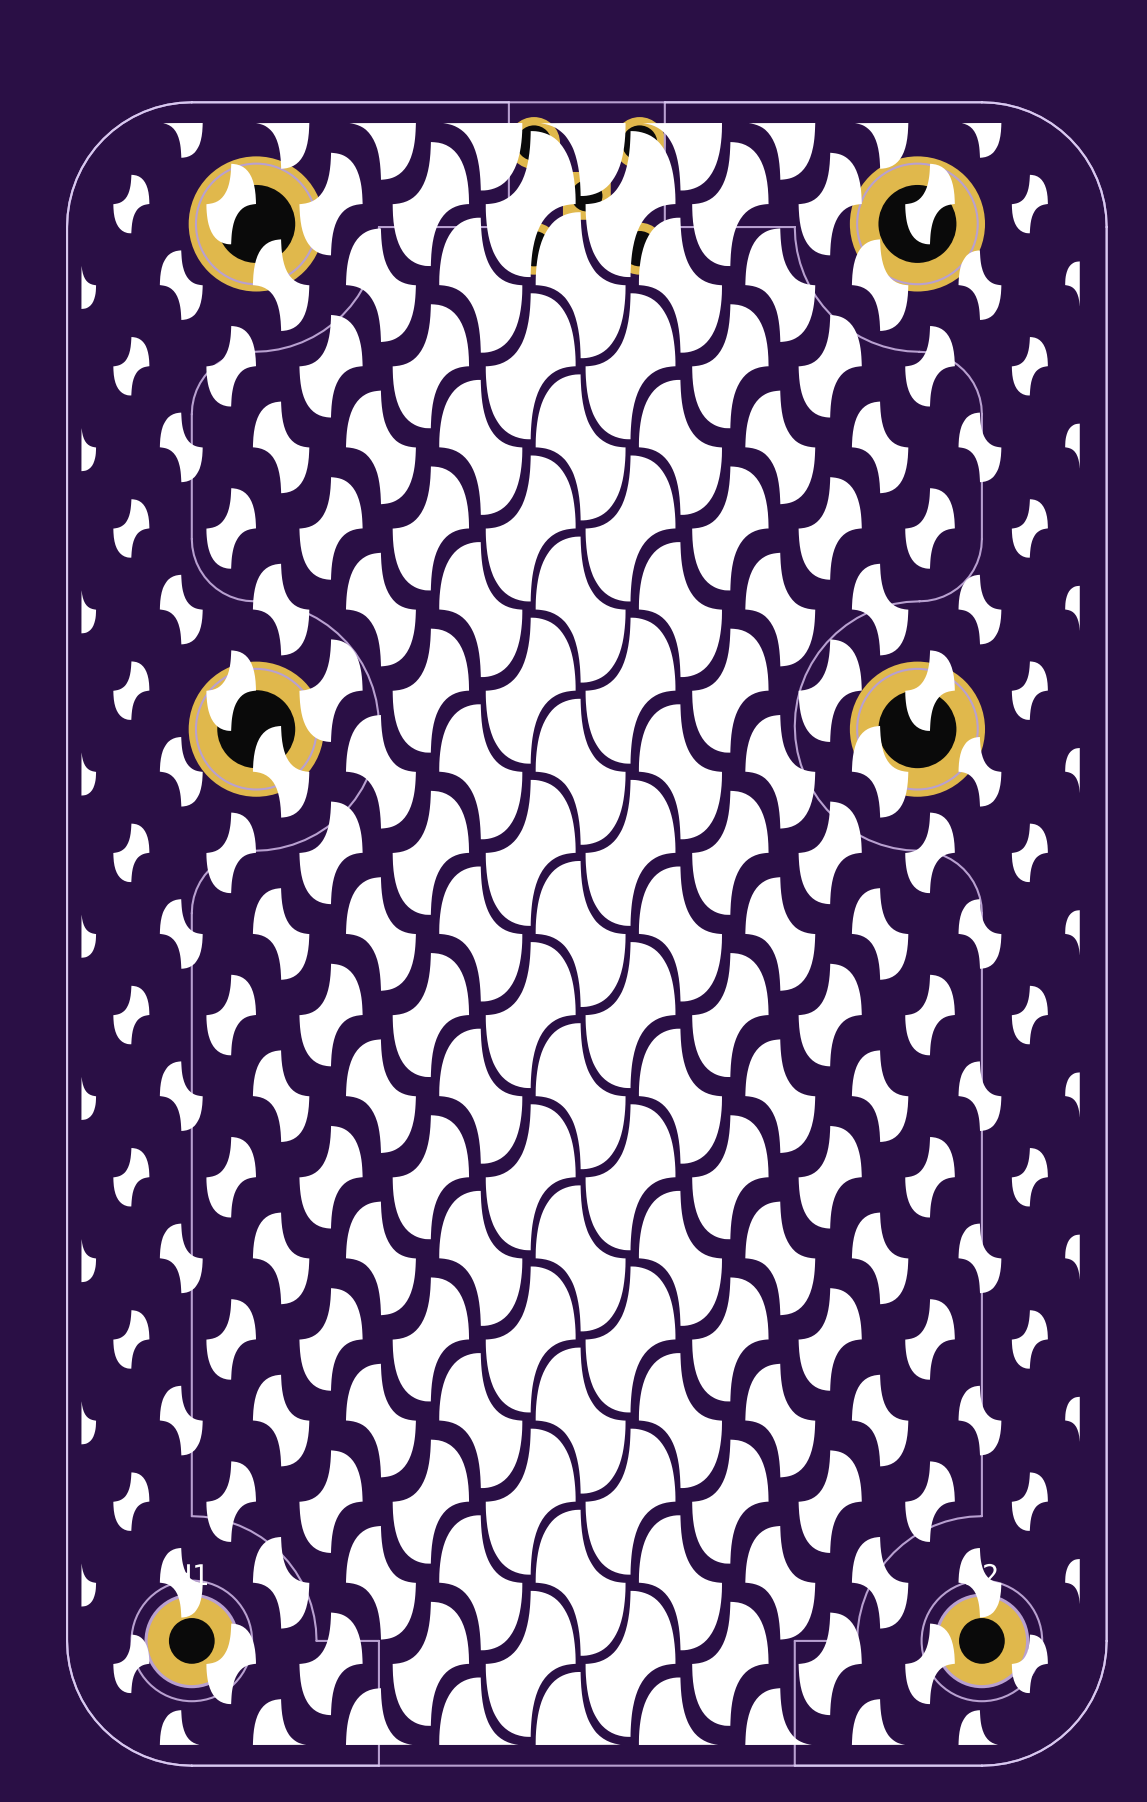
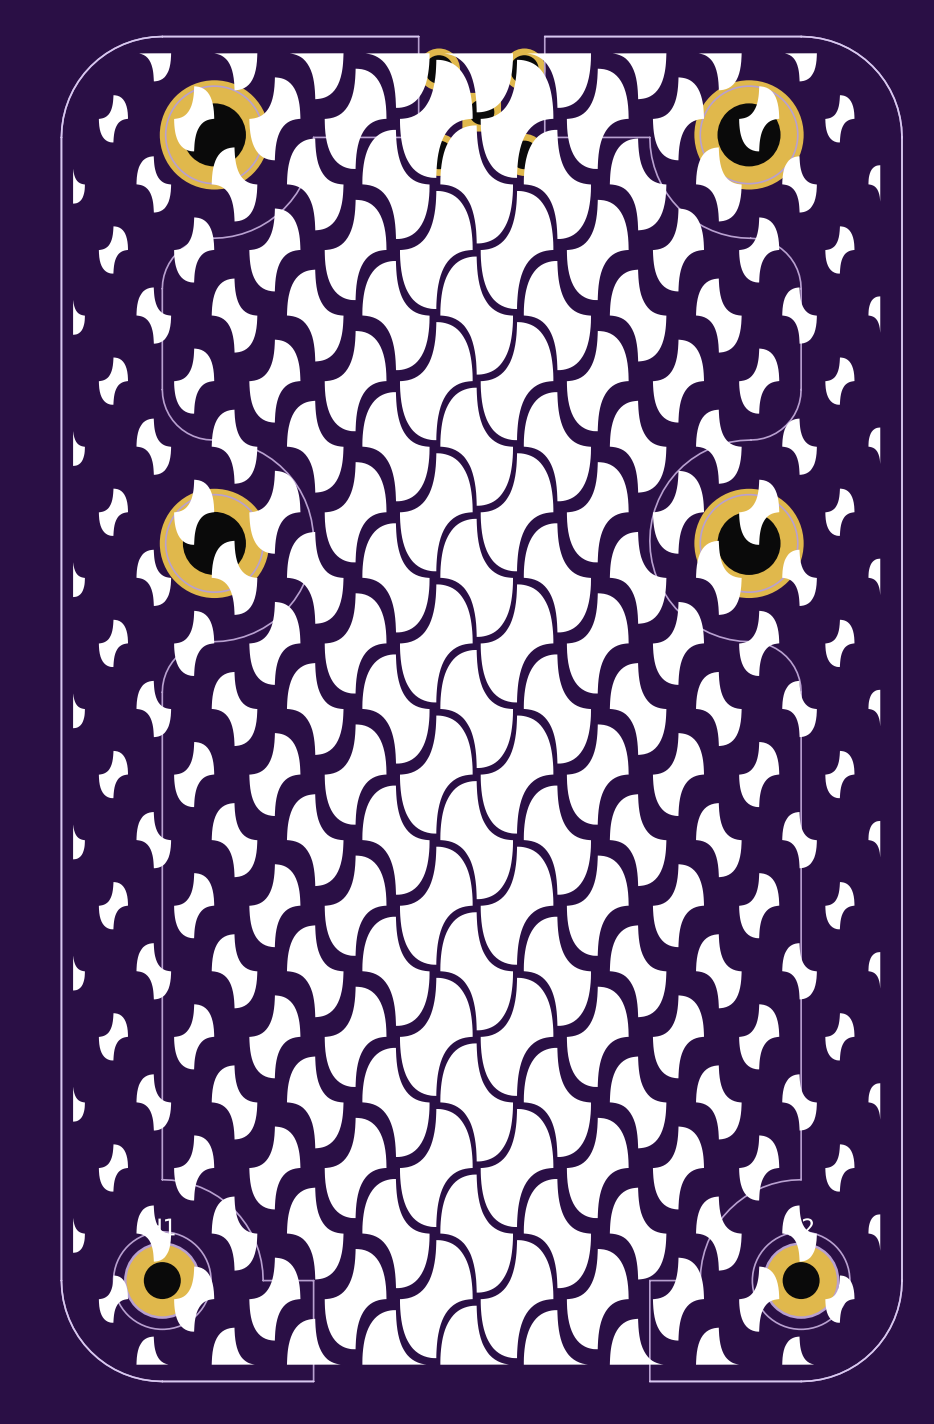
line: (508, 102) (664, 102) -> none
line: (378, 1765) (794, 1765) -> none

